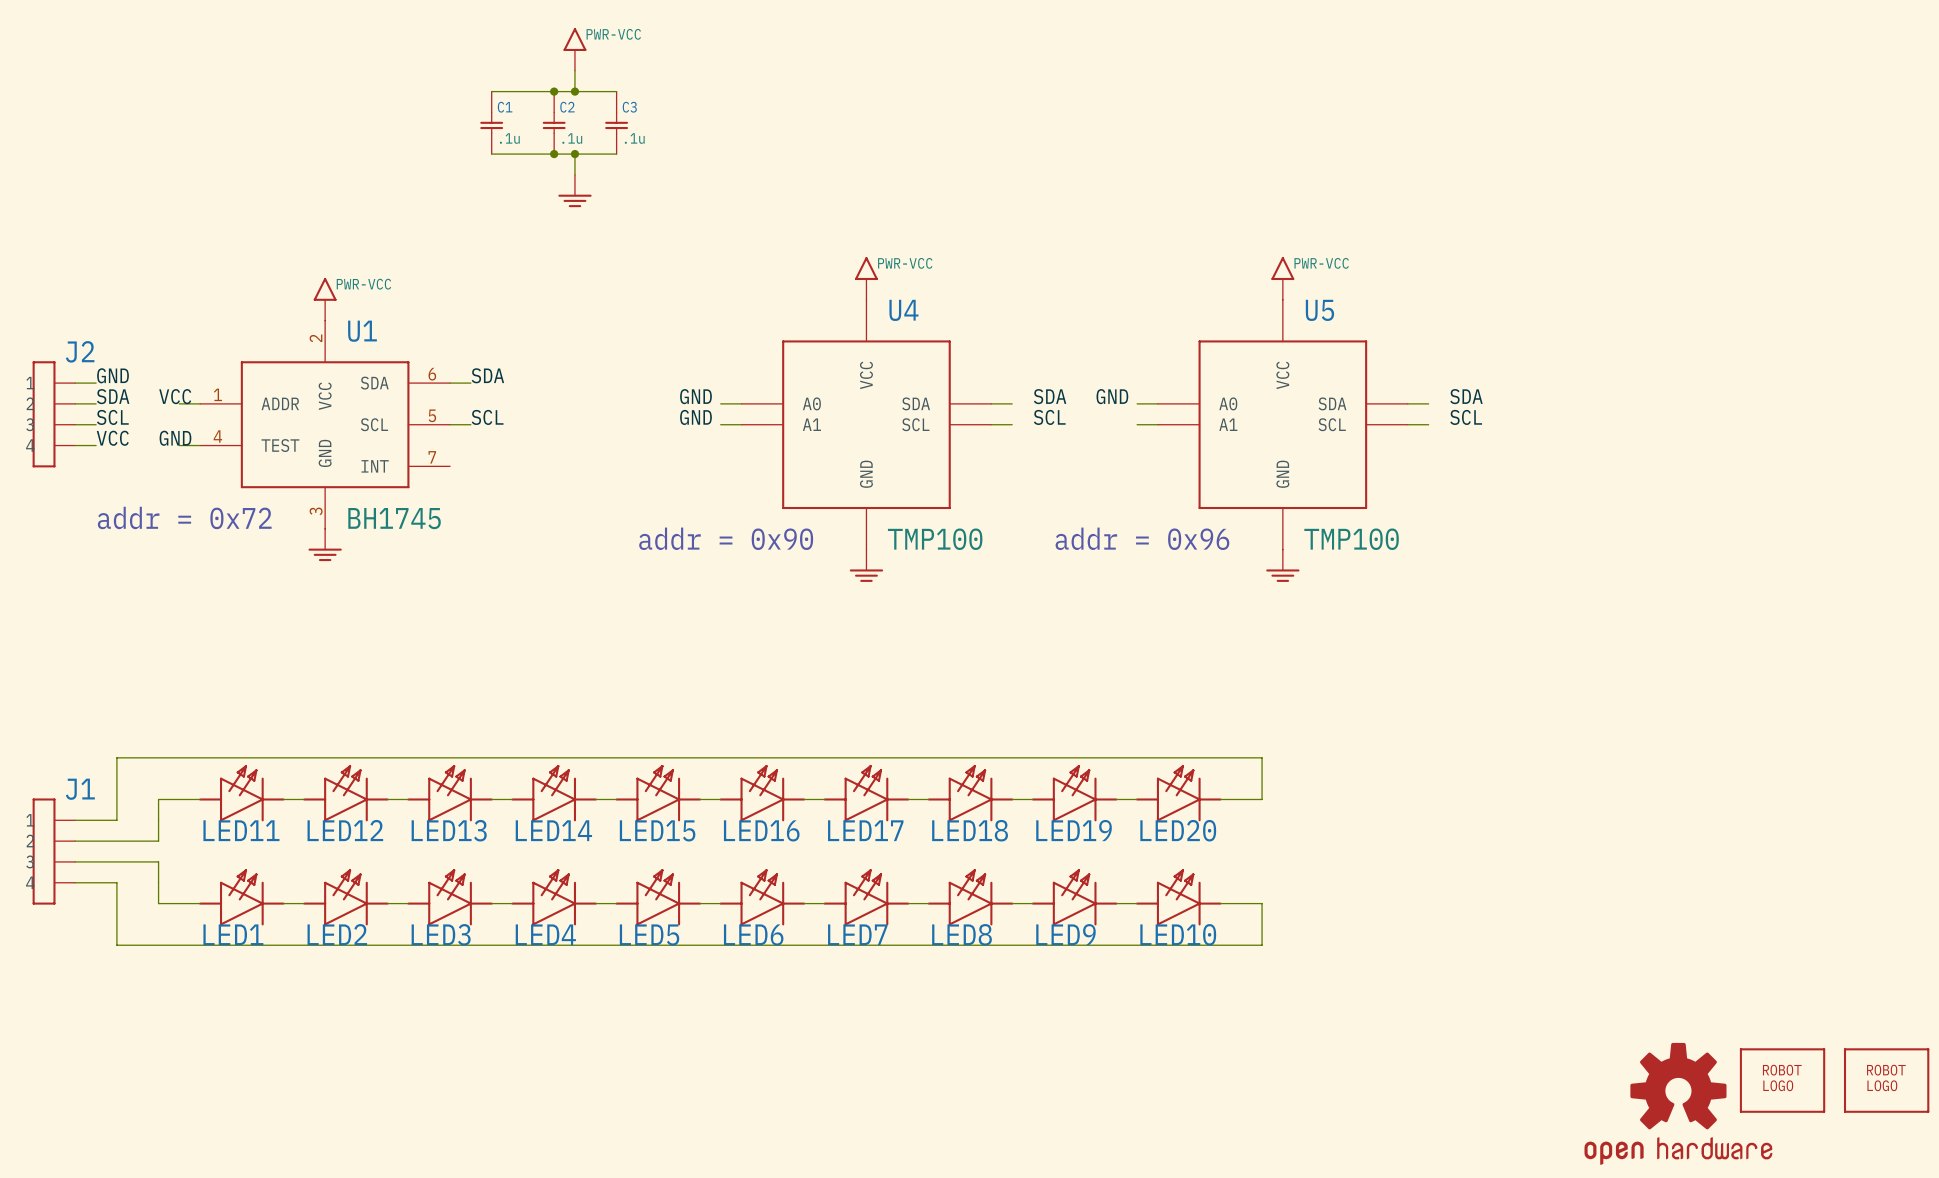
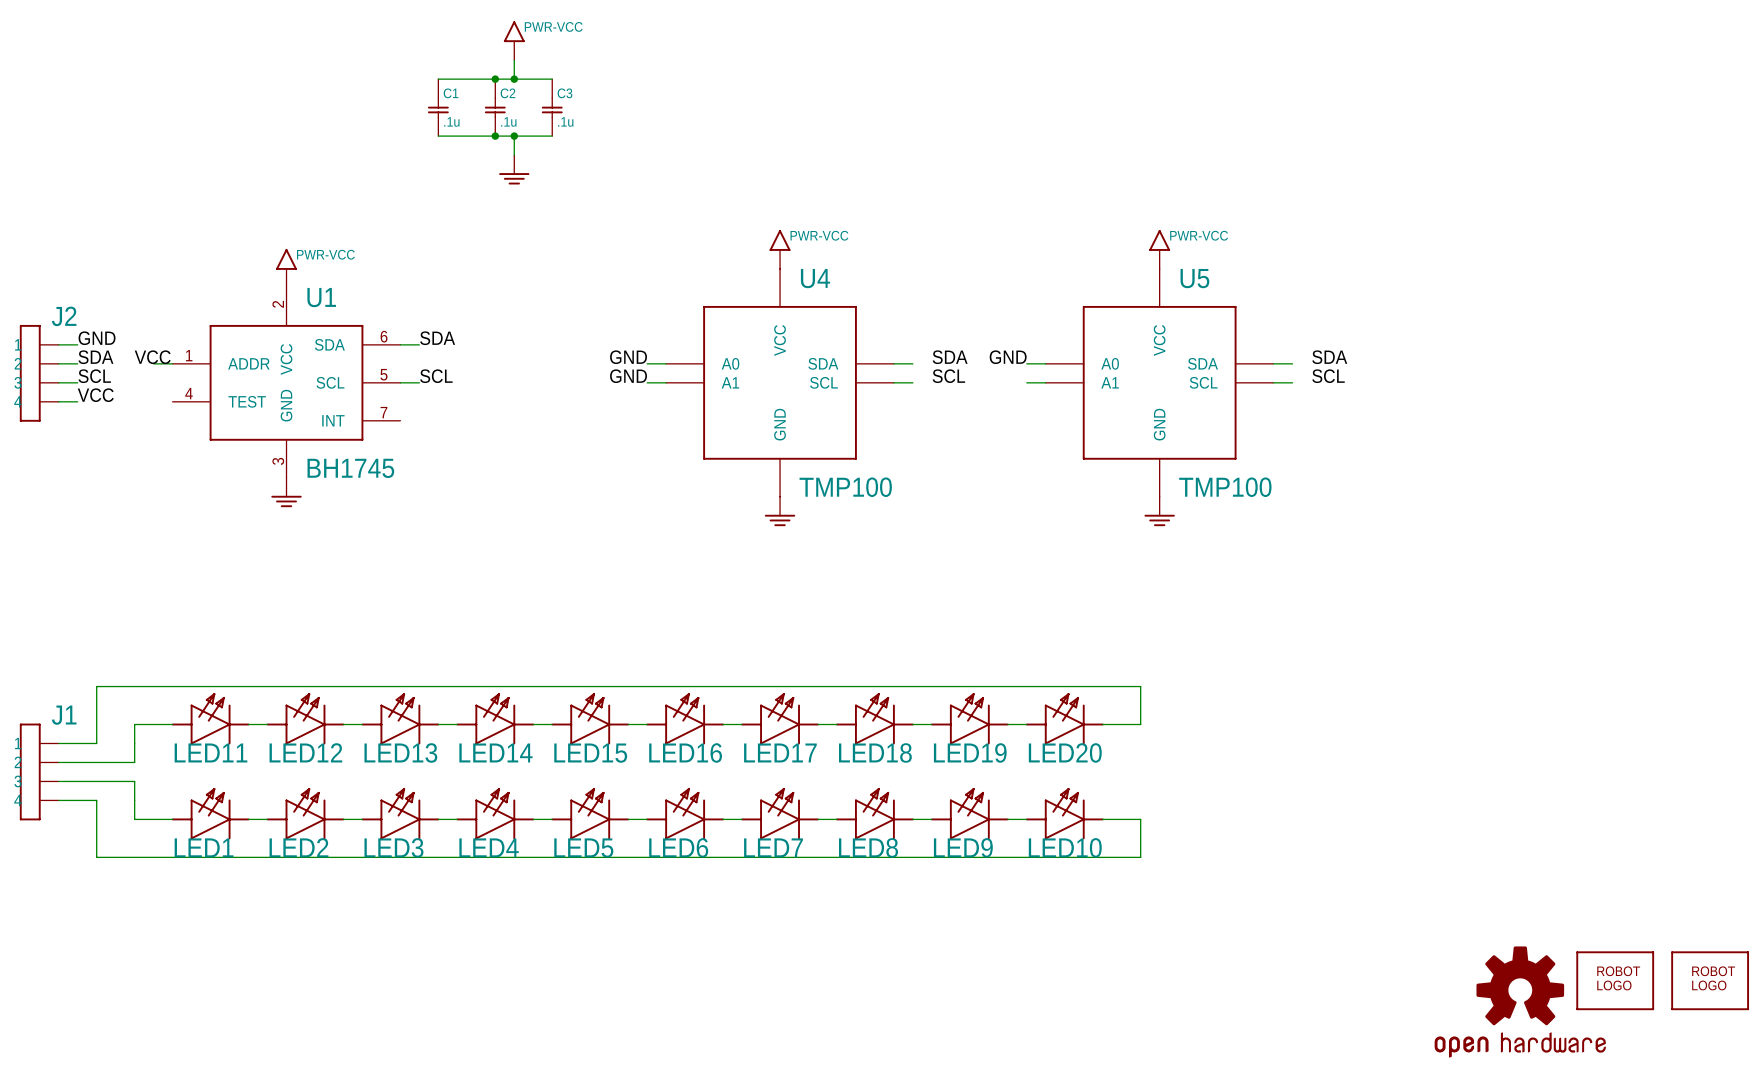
label: GND (175, 438) -> none
wire: (179, 445) (200, 445) -> none
text: addr = 0x72 (184, 517) -> none
text: addr = 0x90 (726, 538) -> none
text: addr = 0x96 (1142, 538) -> none

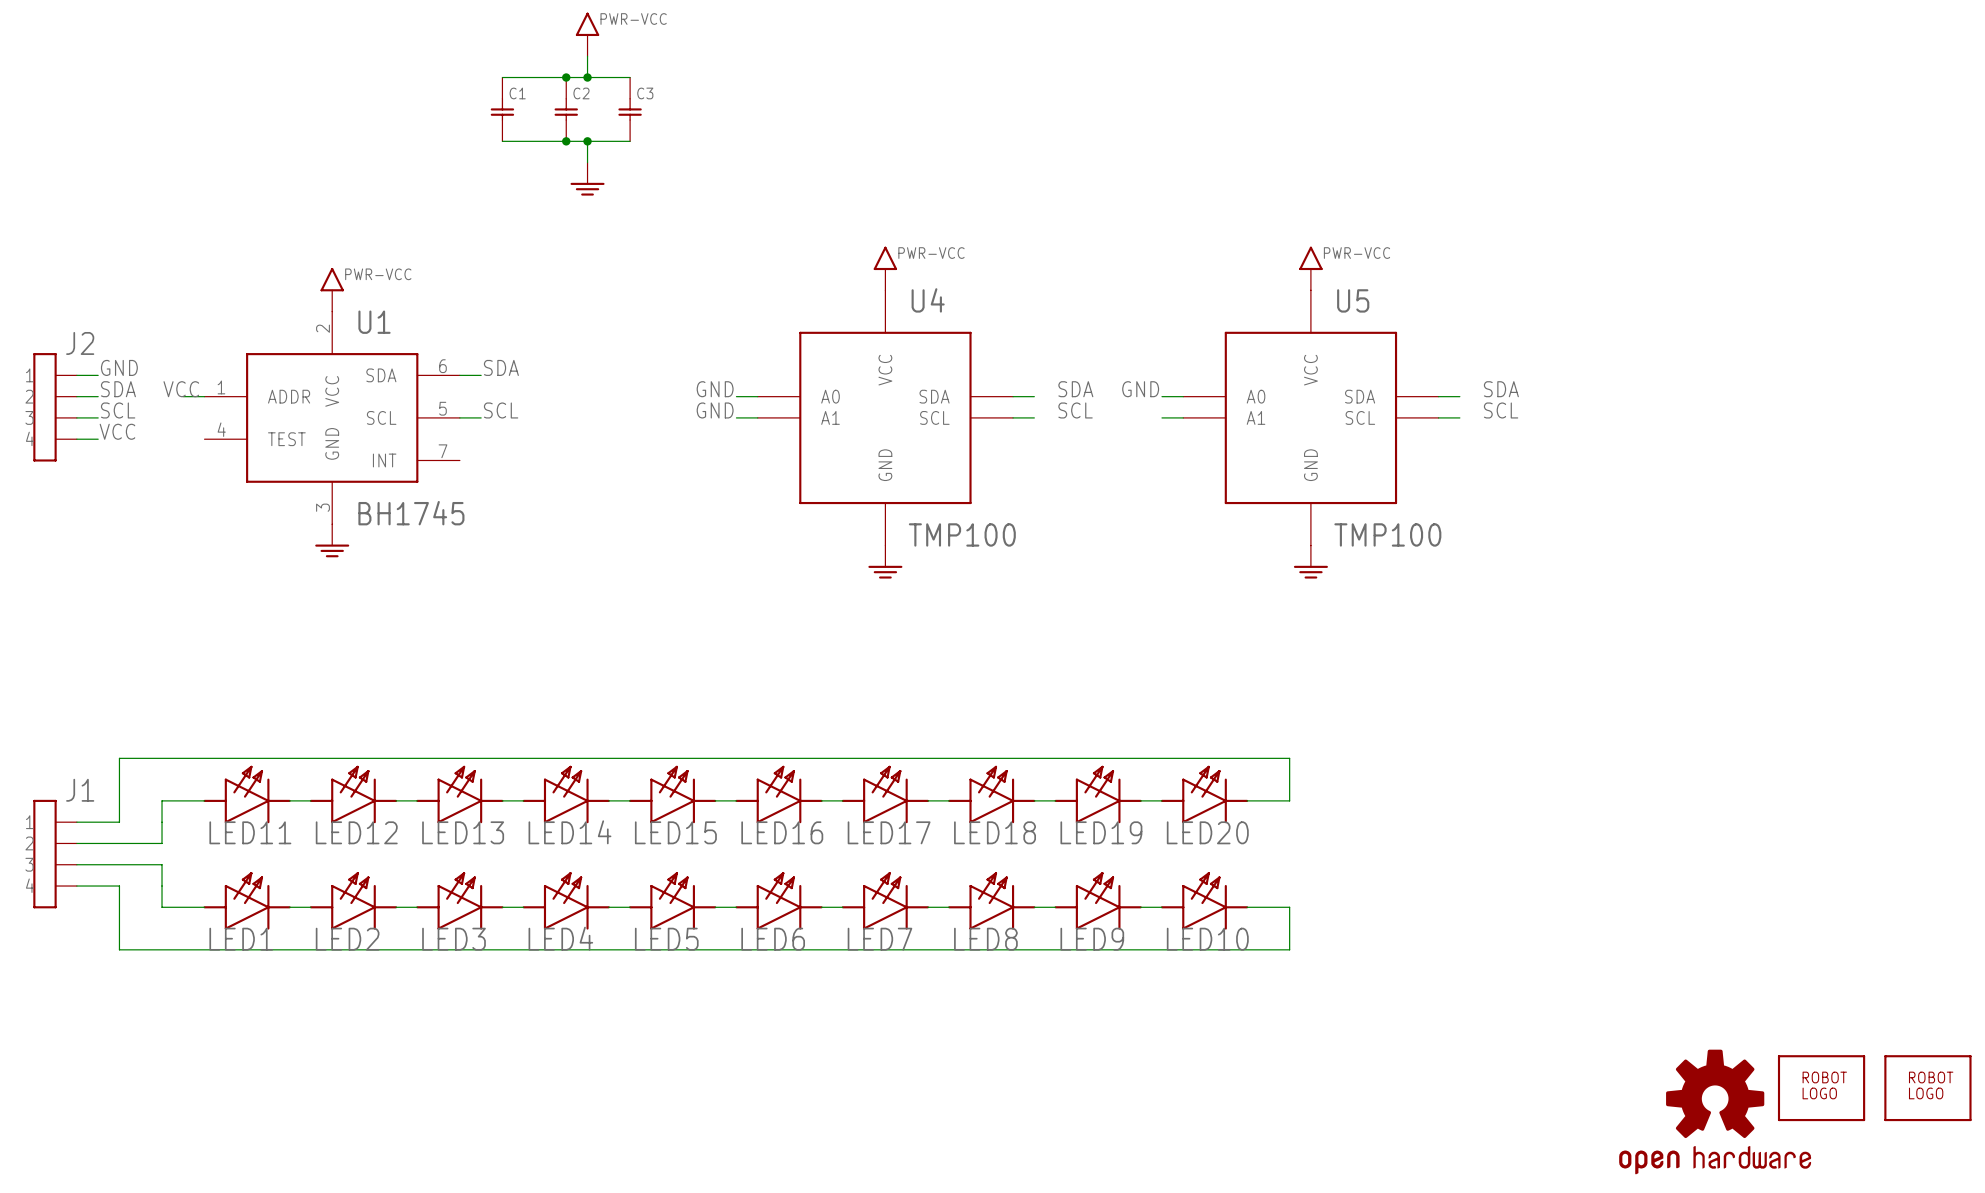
C1 value: .1u (451, 121) -> none
C2 value: .1u (508, 121) -> none
C3 value: .1u (565, 121) -> none

